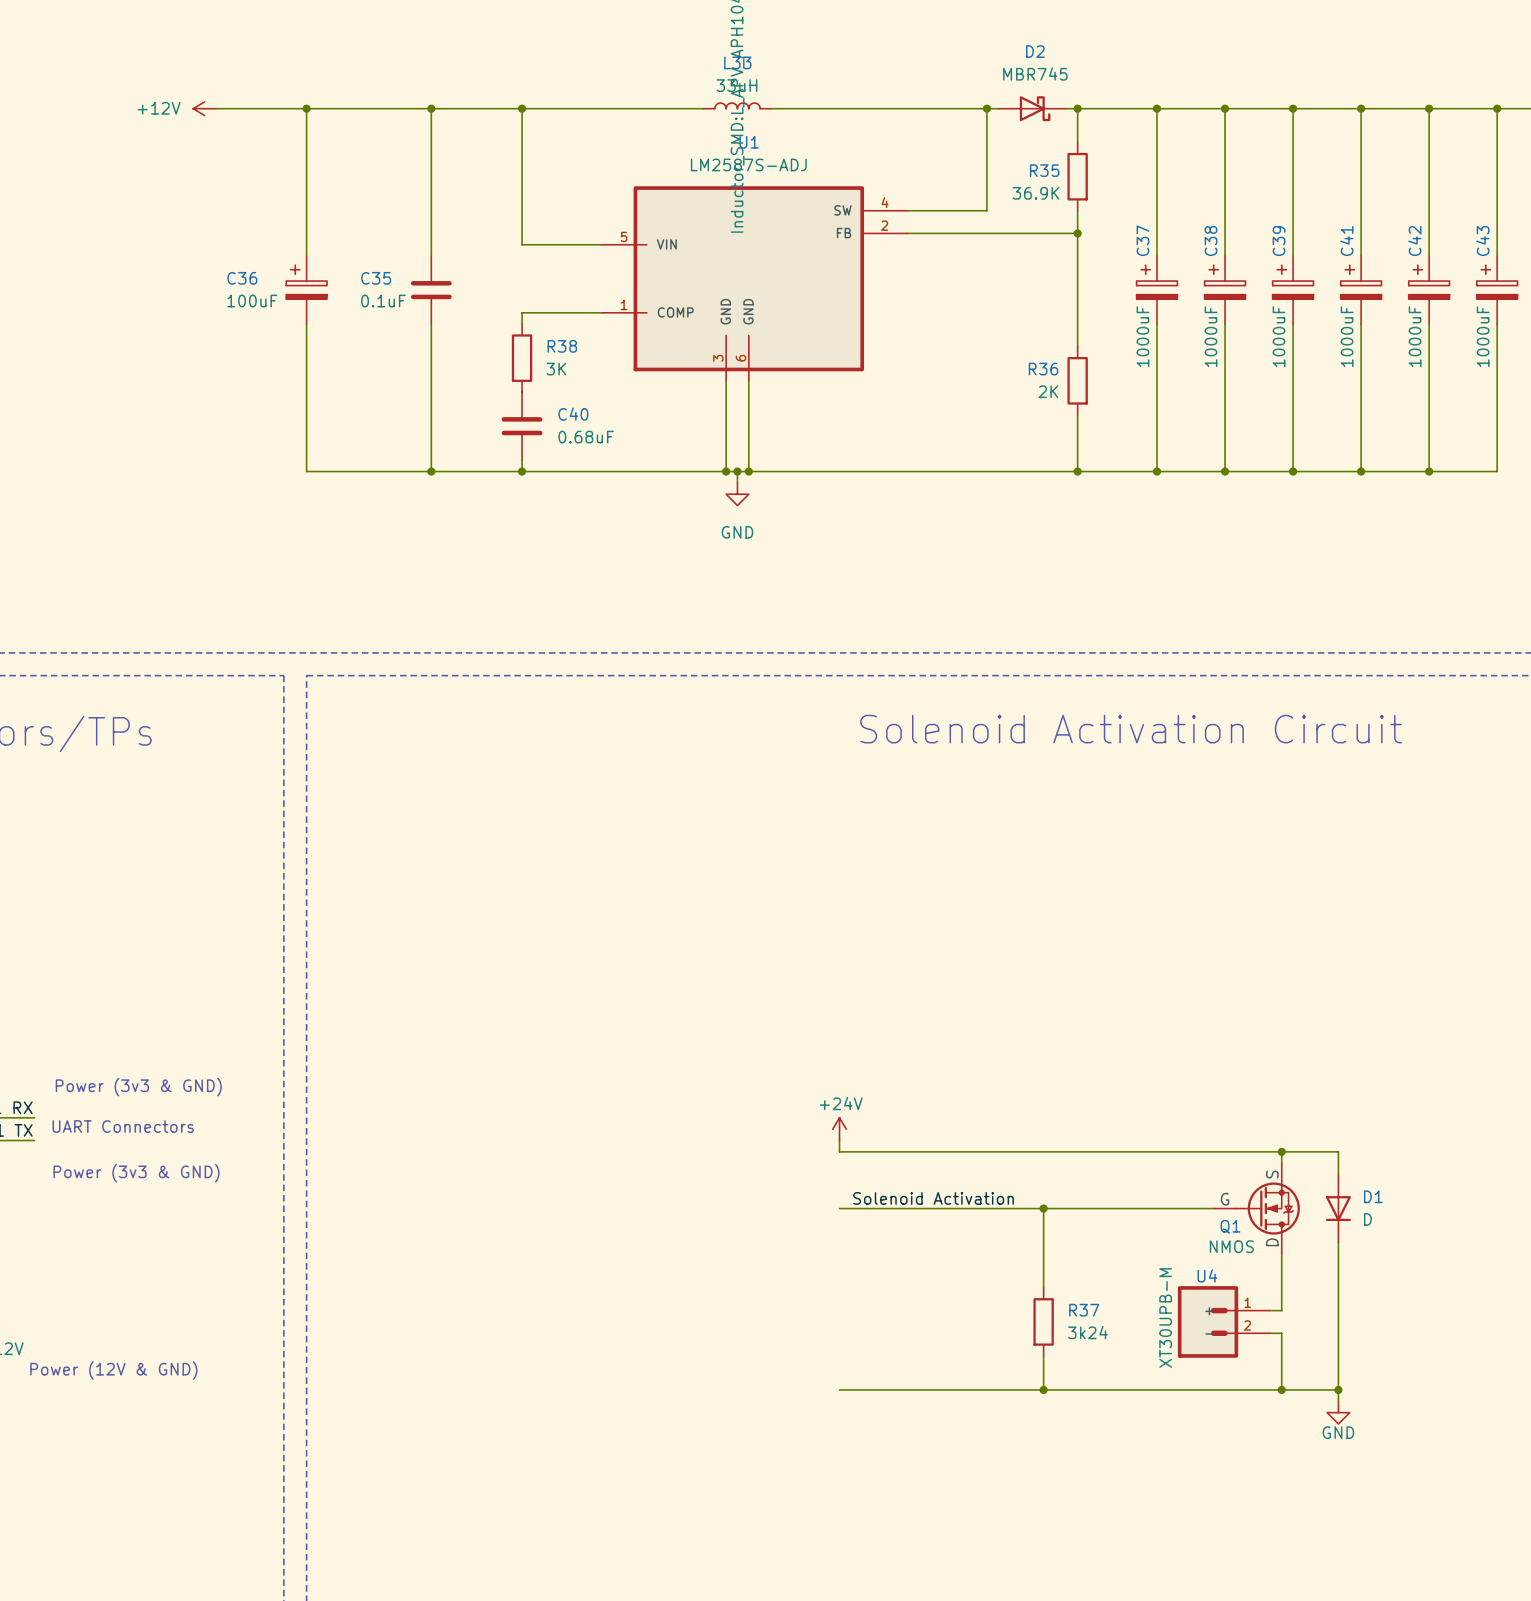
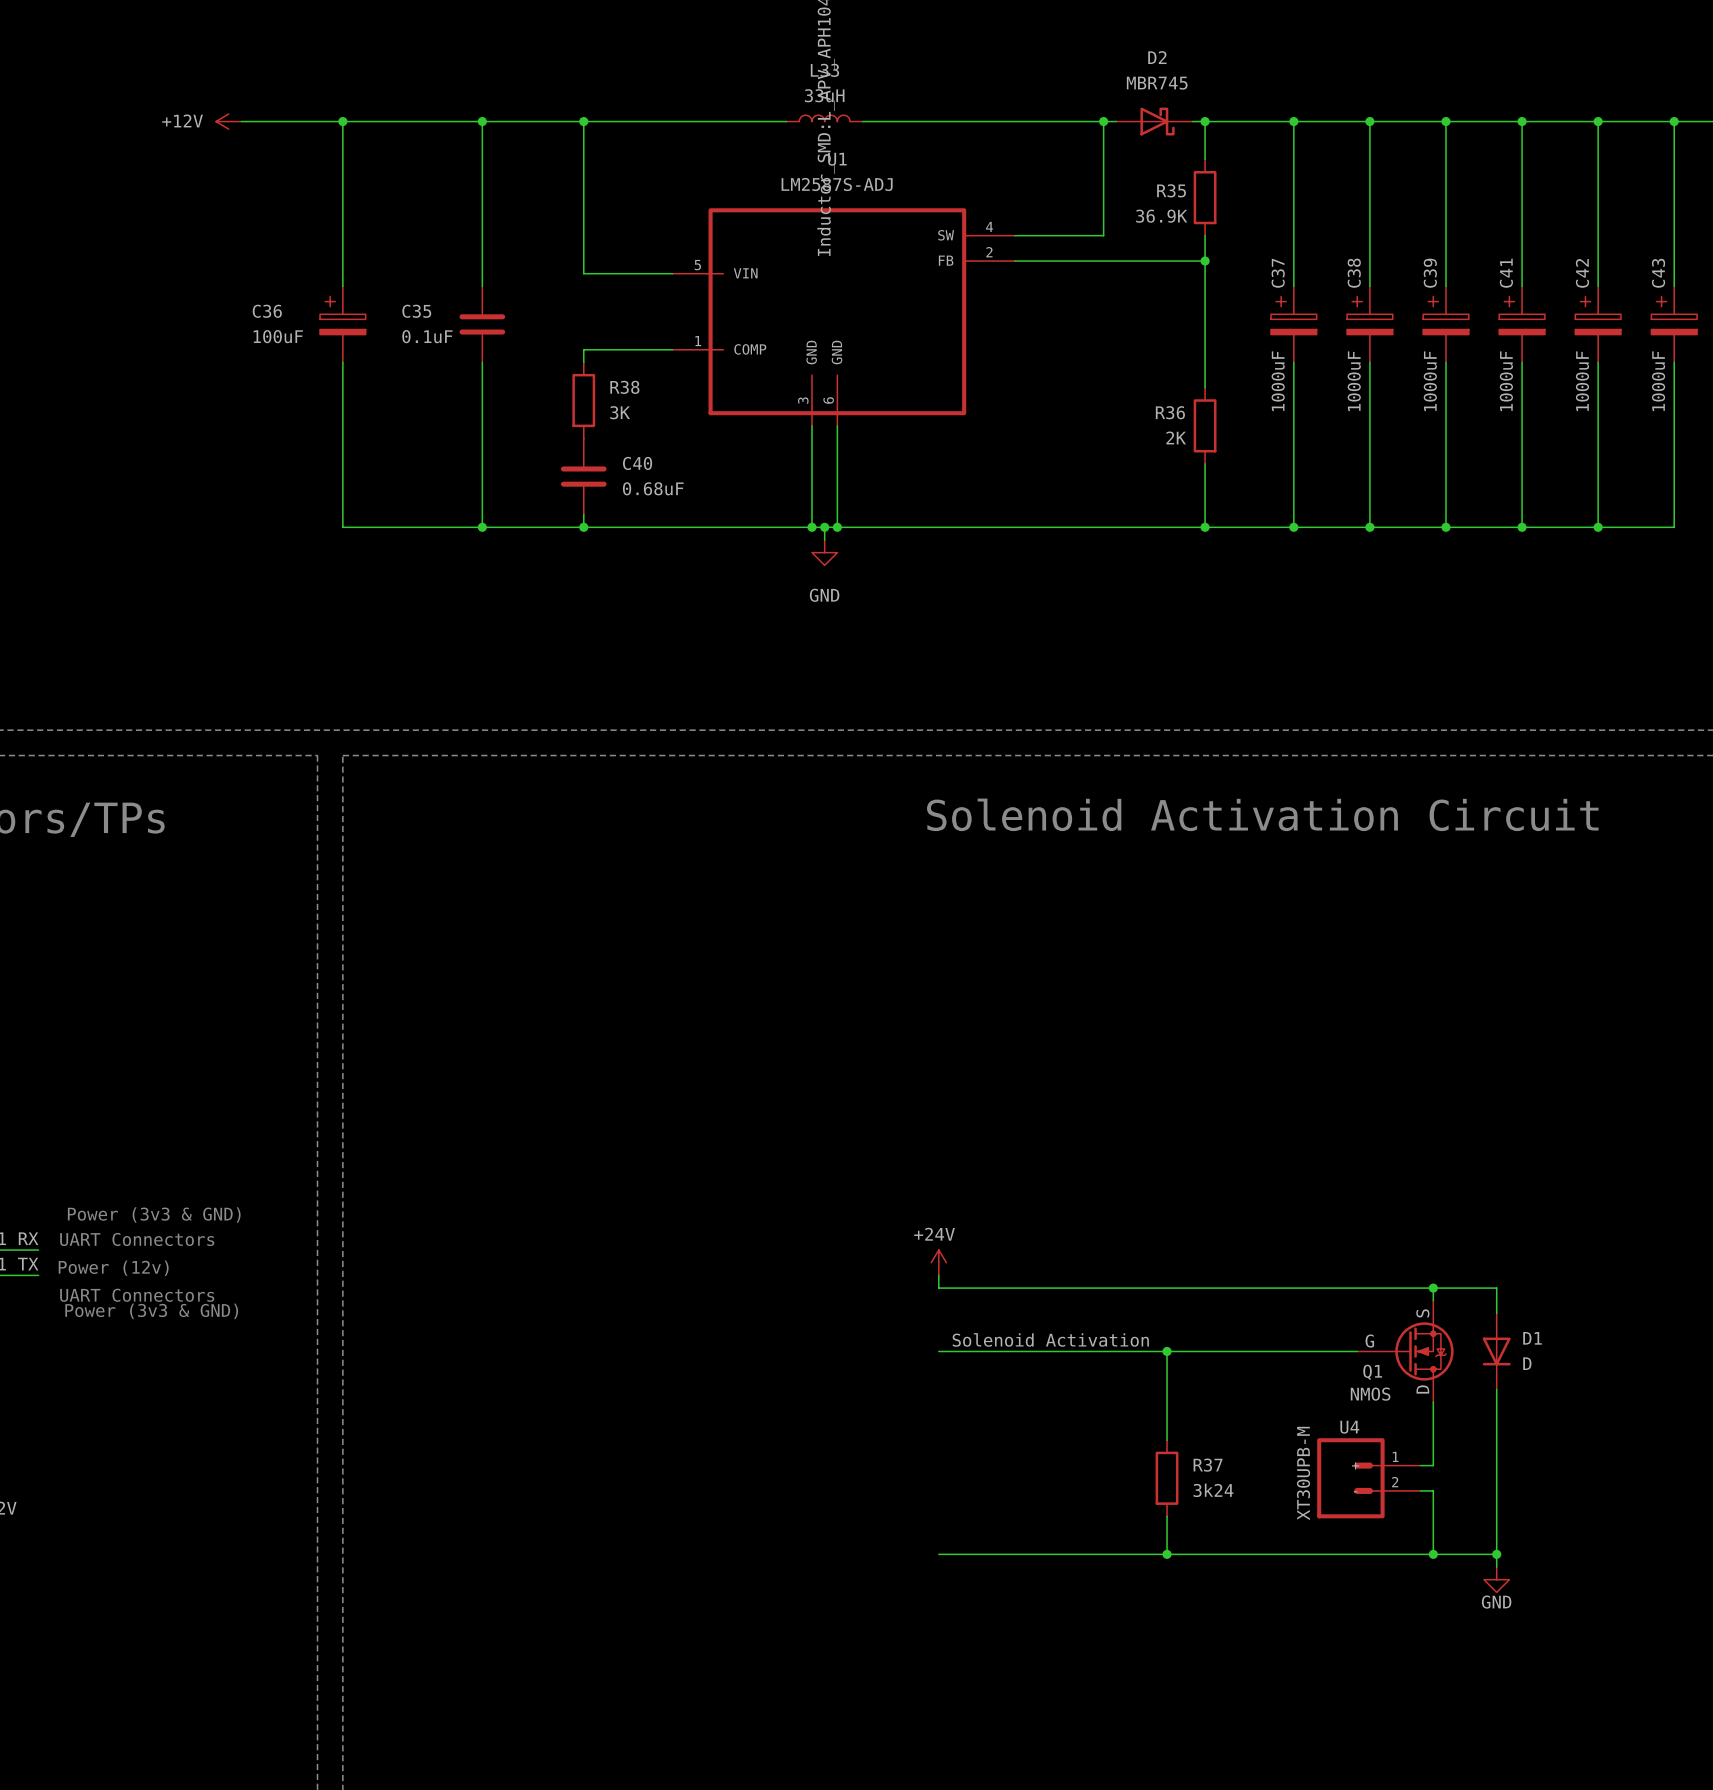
text position: UART Connectors (123, 1126) -> UART Connectors (137, 1239)
text: none -> Power (12v) (113, 1268)
text: none -> UART Connectors (137, 1295)
text: Power (12V & GND) (113, 1370) -> none

